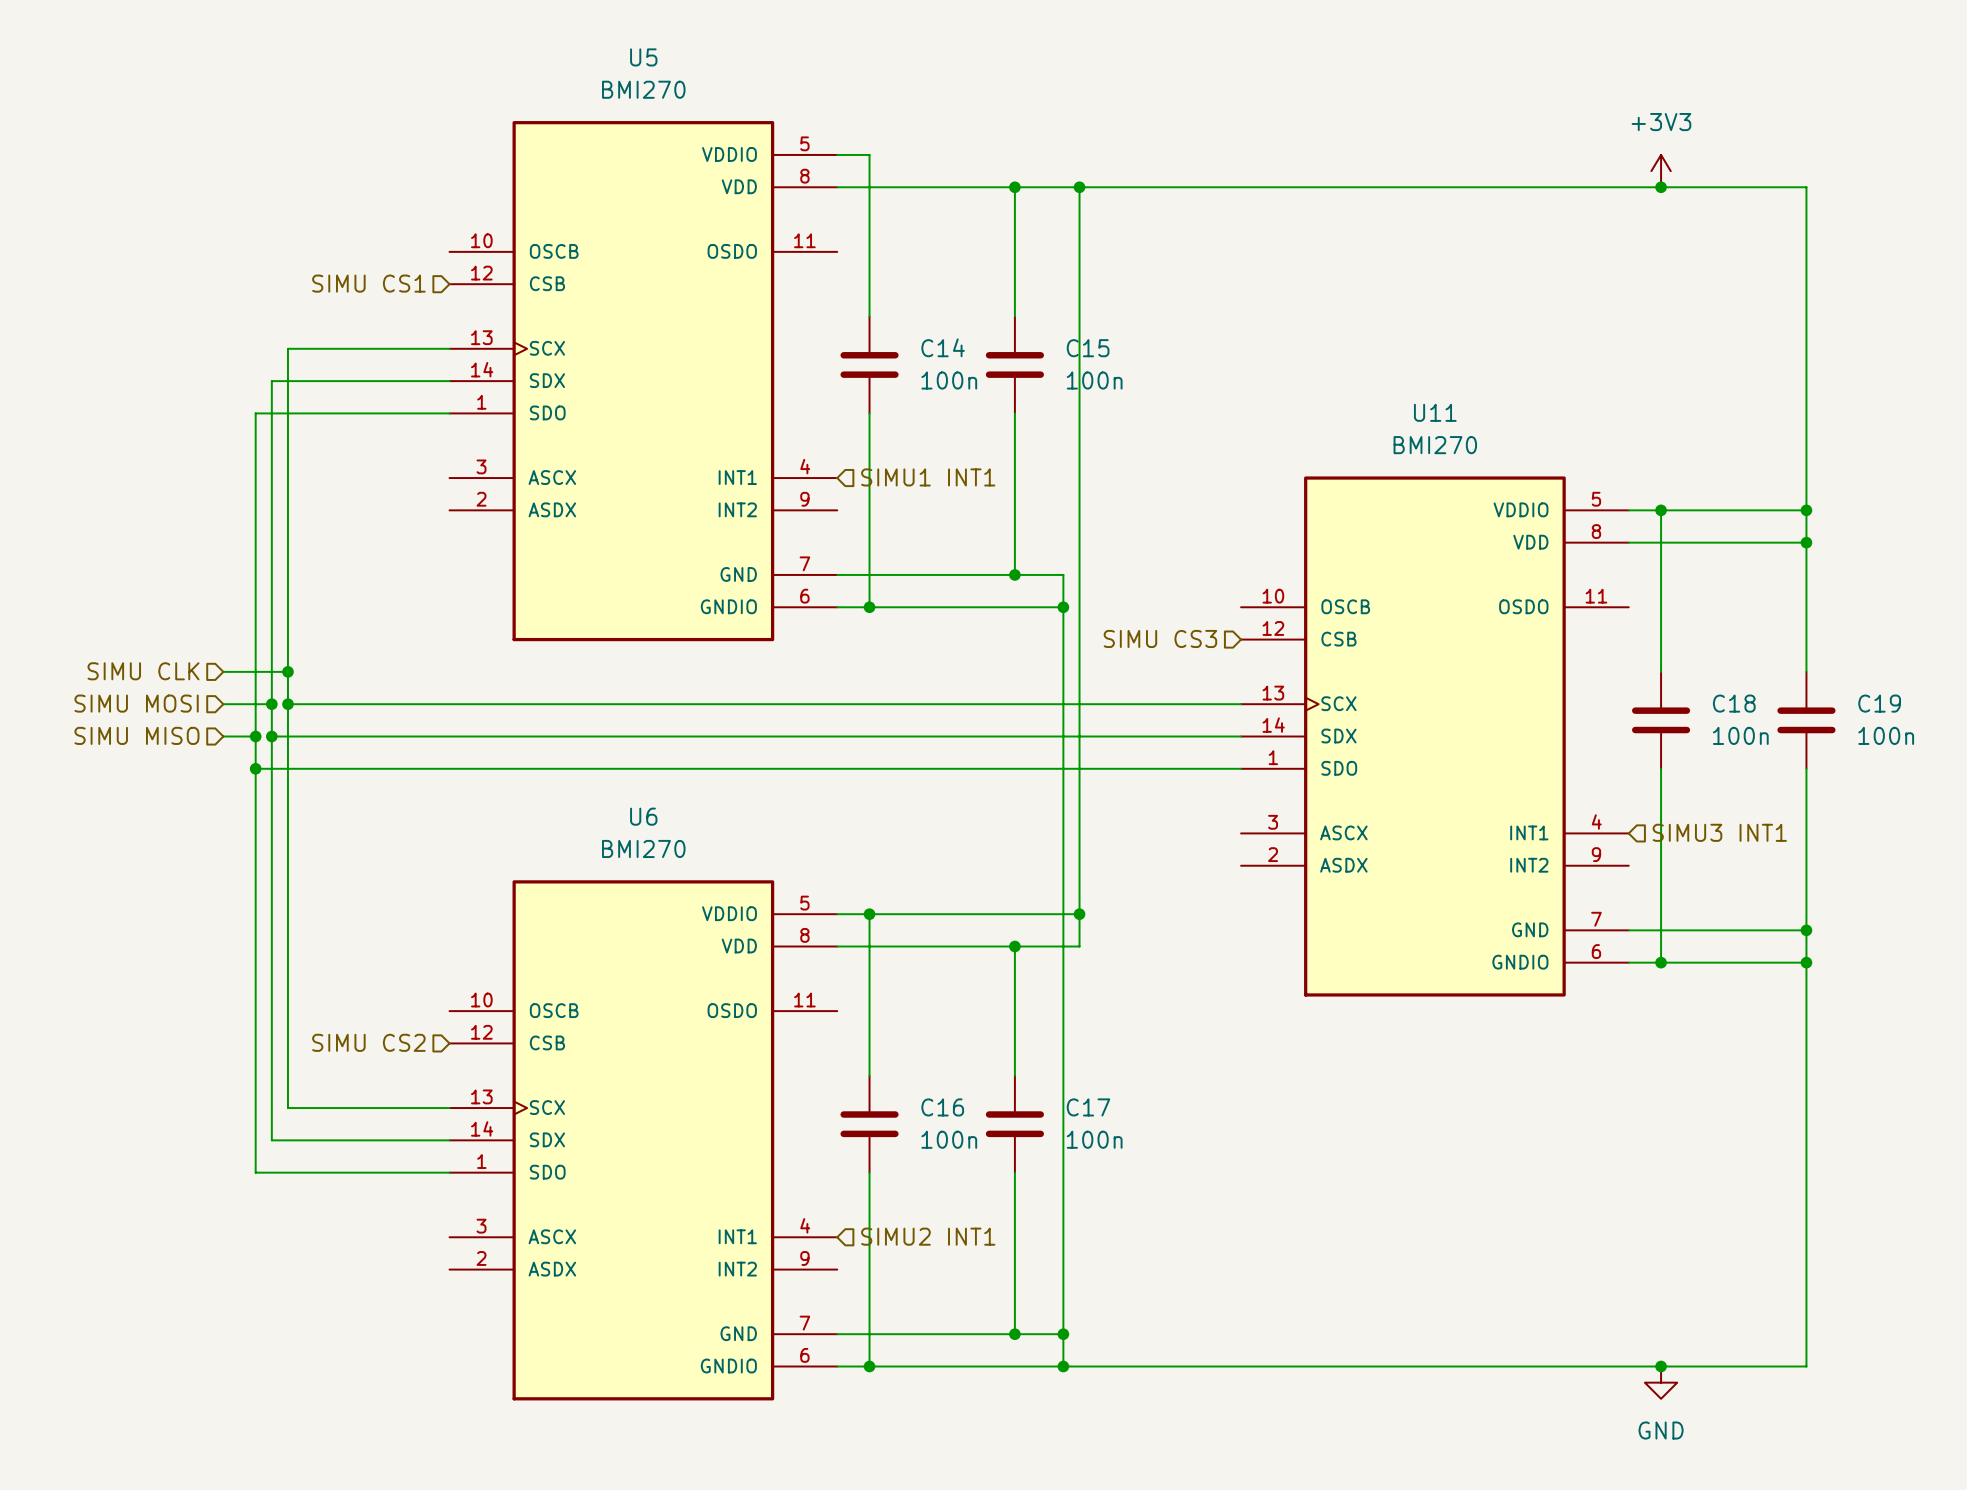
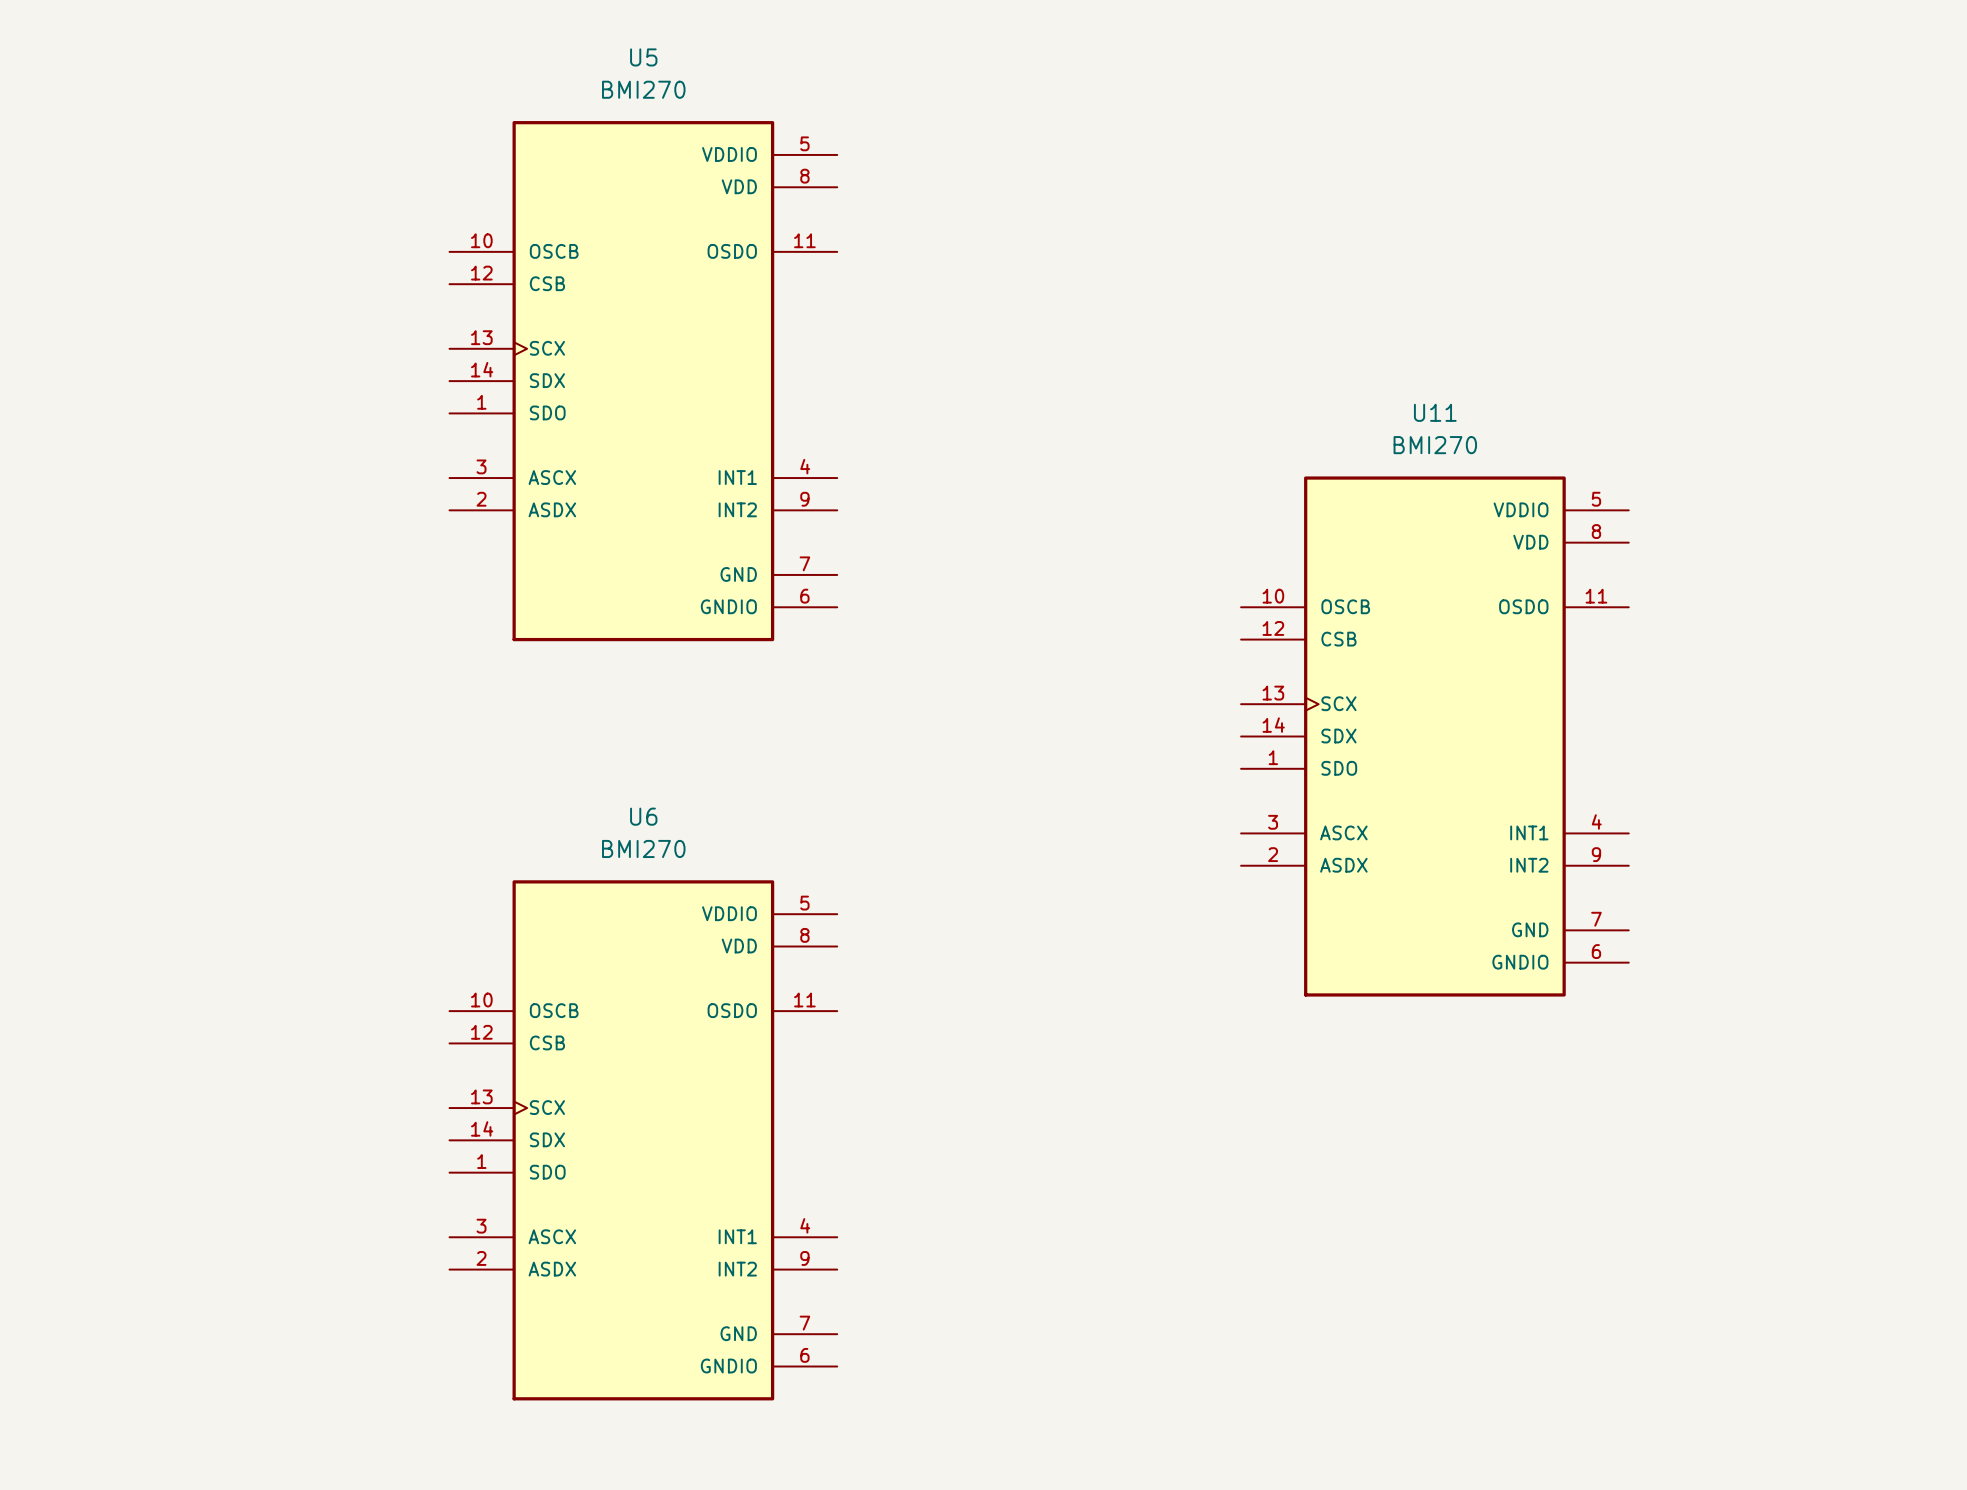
wire: (837, 154) (869, 154) (869, 316) -> none
power symbol: +3V3 (1661, 171) -> none
wire: (837, 187) (1806, 187) (1806, 671) -> none
wire: (1014, 187) (1014, 316) -> none
junction: (1014, 187) -> none
wire: (1079, 187) (1079, 946) (837, 946) -> none
junction: (1079, 187) -> none
junction: (1661, 187) -> none
hierarchical label: SIMU CS1 (368, 283) -> none
wire: (449, 348) (287, 348) (287, 1108) (449, 1108) -> none
C14: 100n (869, 364) -> none
C15: 100n (1014, 364) -> none
wire: (449, 381) (271, 381) (271, 1140) (449, 1140) -> none
wire: (449, 413) (255, 413) (255, 1172) (449, 1172) -> none
wire: (869, 413) (869, 607) -> none
wire: (1014, 413) (1014, 574) -> none
hierarchical label: SIMU1 INT1 (928, 477) -> none
wire: (1628, 510) (1806, 510) -> none
wire: (1661, 510) (1661, 671) -> none
junction: (1661, 510) -> none
junction: (1806, 510) -> none
wire: (1628, 542) (1806, 542) -> none
junction: (1806, 542) -> none
wire: (837, 574) (1063, 574) (1063, 1366) -> none
junction: (1014, 574) -> none
wire: (837, 607) (1063, 607) -> none
junction: (869, 607) -> none
junction: (1063, 607) -> none
hierarchical label: SIMU CS3 (1160, 638) -> none
hierarchical label: SIMU CLK (143, 671) -> none
wire: (223, 671) (287, 671) -> none
junction: (287, 671) -> none
hierarchical label: SIMU MOSI (136, 703) -> none
wire: (223, 704) (271, 704) -> none
junction: (271, 704) -> none
wire: (287, 704) (1241, 704) -> none
junction: (287, 704) -> none
C18: 100n (1661, 720) -> none
C19: 100n (1806, 720) -> none
hierarchical label: SIMU MISO (136, 735) -> none
wire: (223, 736) (255, 736) -> none
junction: (255, 736) -> none
wire: (271, 736) (1241, 736) -> none
junction: (271, 736) -> none
wire: (255, 768) (1241, 768) -> none
junction: (255, 768) -> none
wire: (1661, 768) (1661, 962) -> none
wire: (1806, 768) (1806, 1366) (837, 1366) -> none
hierarchical label: SIMU3 INT1 (1719, 832) -> none
wire: (837, 914) (1079, 914) -> none
wire: (869, 914) (869, 1075) -> none
junction: (869, 914) -> none
junction: (1079, 914) -> none
wire: (1628, 930) (1806, 930) -> none
junction: (1806, 930) -> none
wire: (1014, 946) (1014, 1075) -> none
junction: (1014, 946) -> none
wire: (1628, 962) (1806, 962) -> none
junction: (1661, 962) -> none
junction: (1806, 962) -> none
hierarchical label: SIMU CS2 (368, 1042) -> none
C16: 100n (869, 1124) -> none
C17: 100n (1014, 1124) -> none
wire: (869, 1172) (869, 1366) -> none
wire: (1014, 1172) (1014, 1334) -> none
hierarchical label: SIMU2 INT1 (928, 1236) -> none
wire: (837, 1334) (1063, 1334) -> none
junction: (1014, 1334) -> none
junction: (1063, 1334) -> none
junction: (869, 1366) -> none
junction: (1063, 1366) -> none
junction: (1661, 1366) -> none
power symbol: GND (1661, 1382) -> none

